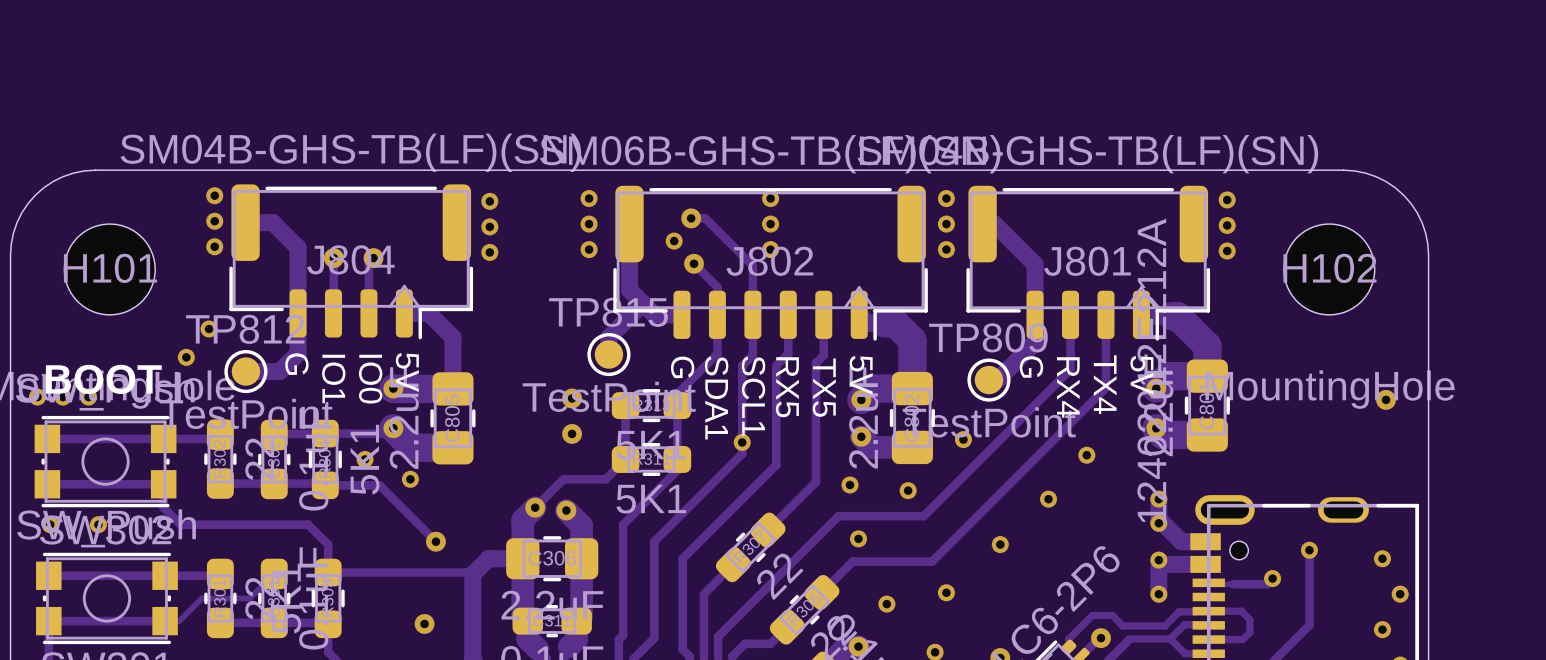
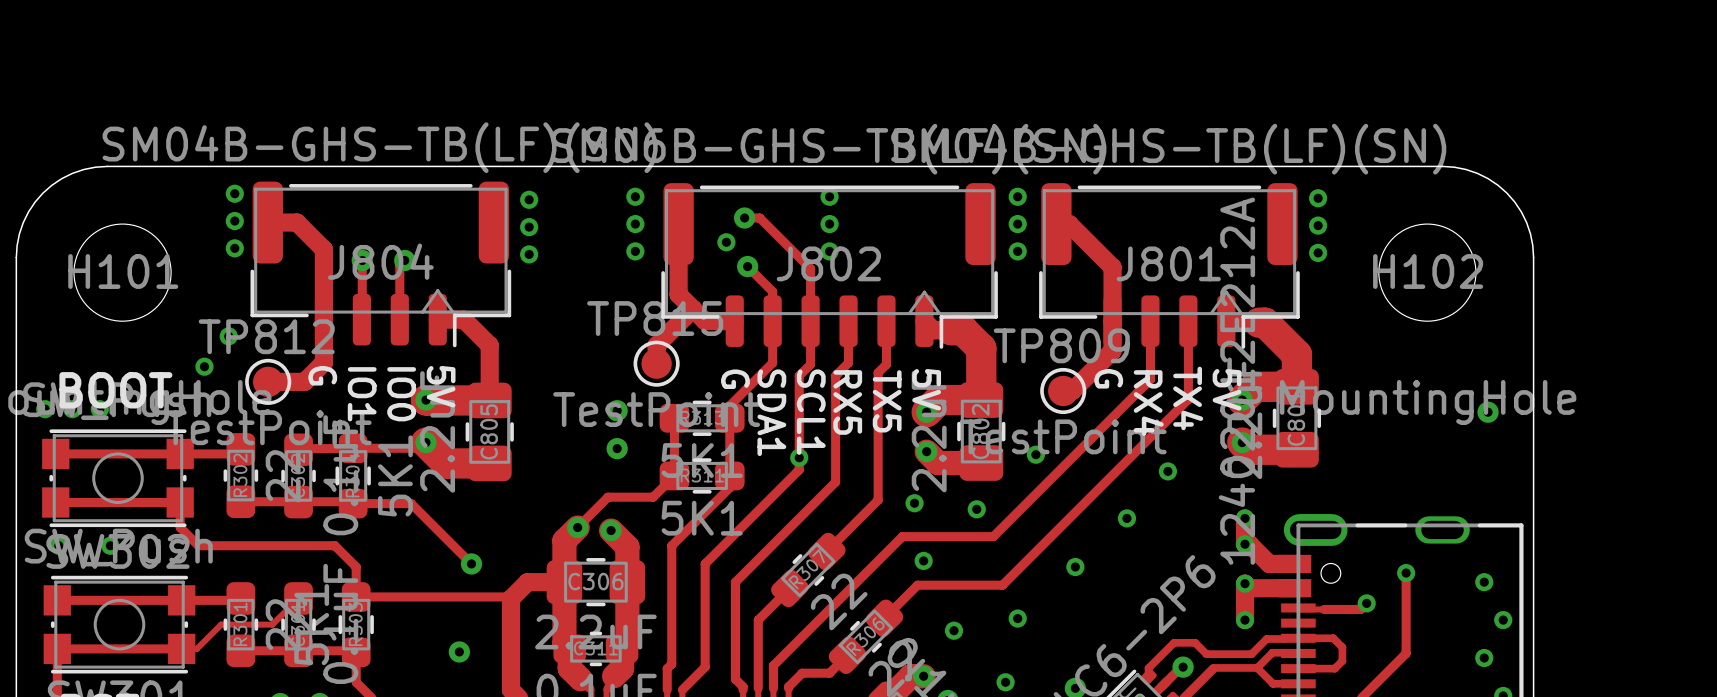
via: (365, 459) -> none
via: (410, 479) -> none

